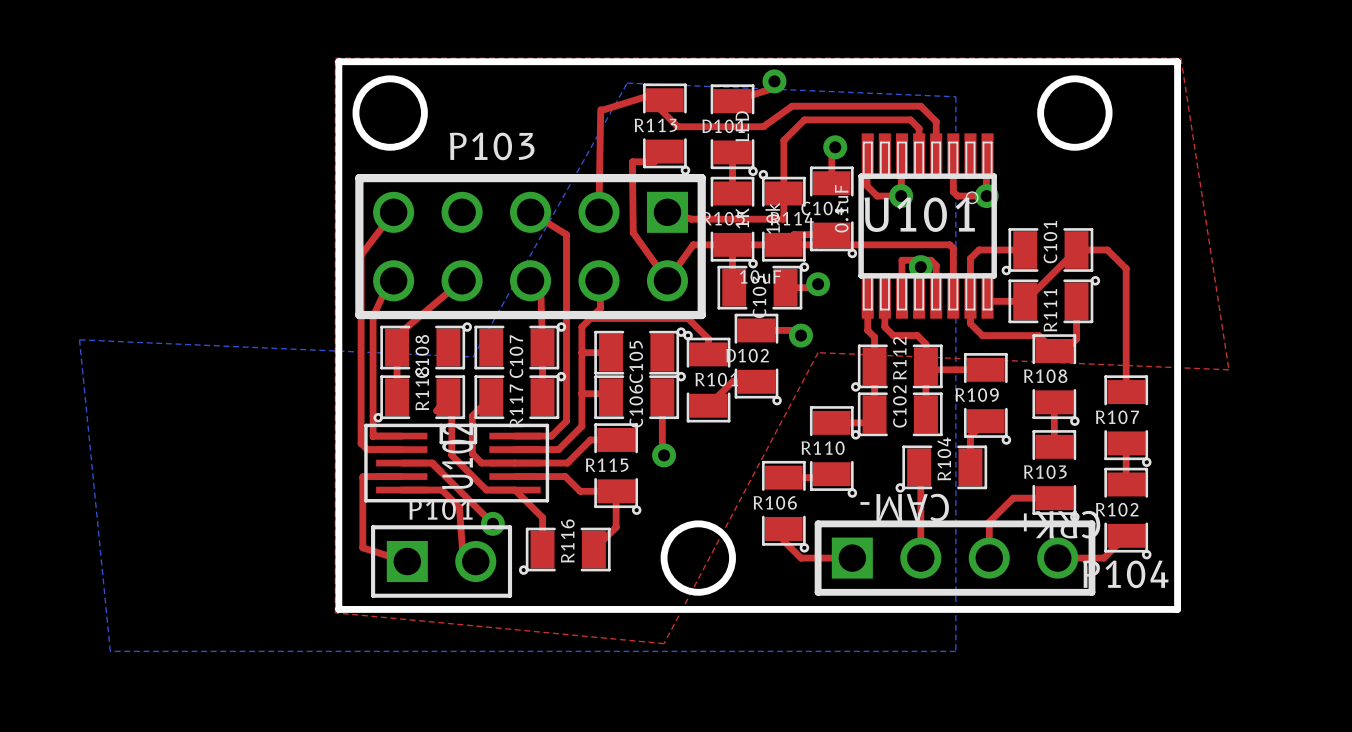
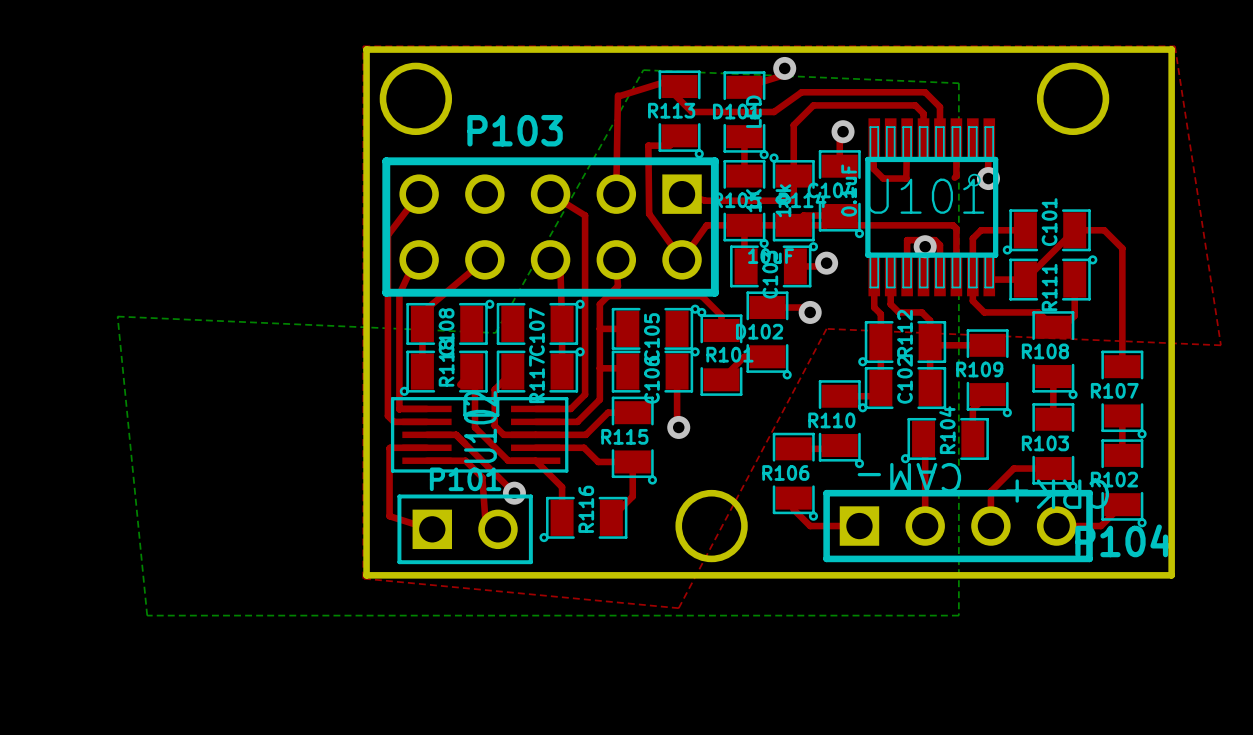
top track: (953, 191) (957, 196) (986, 196) -> (956, 174) (954, 177)
via: (901, 196) -> none

